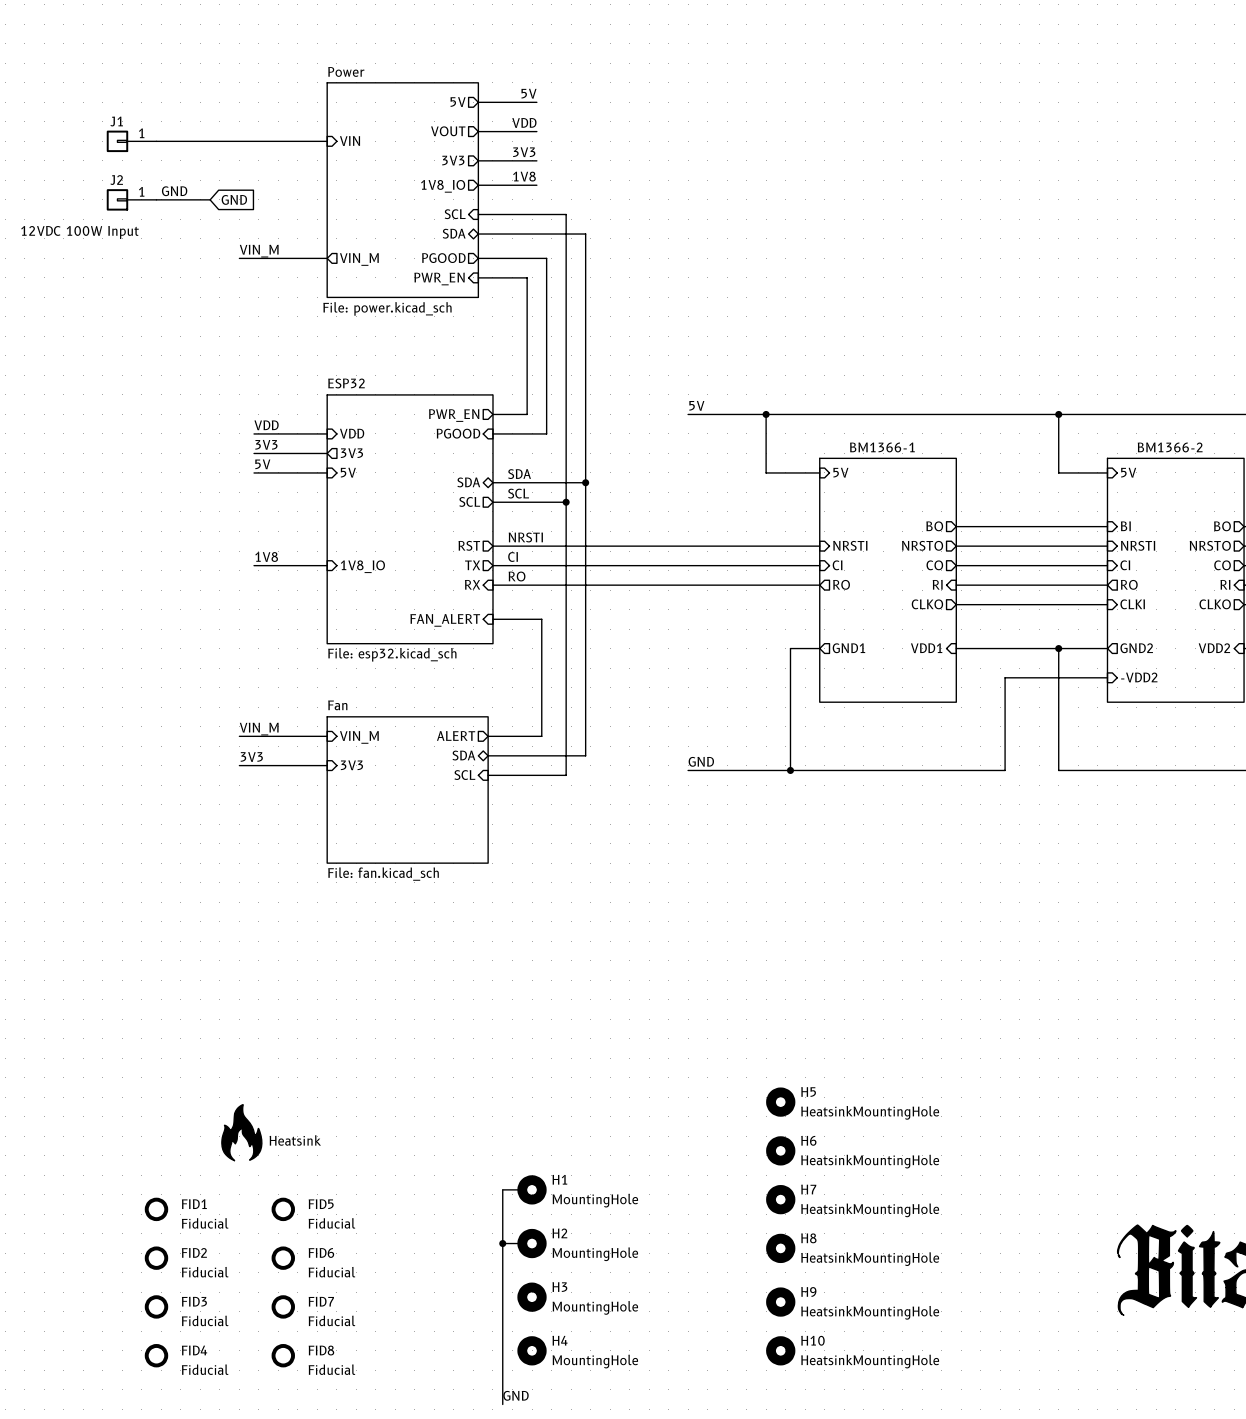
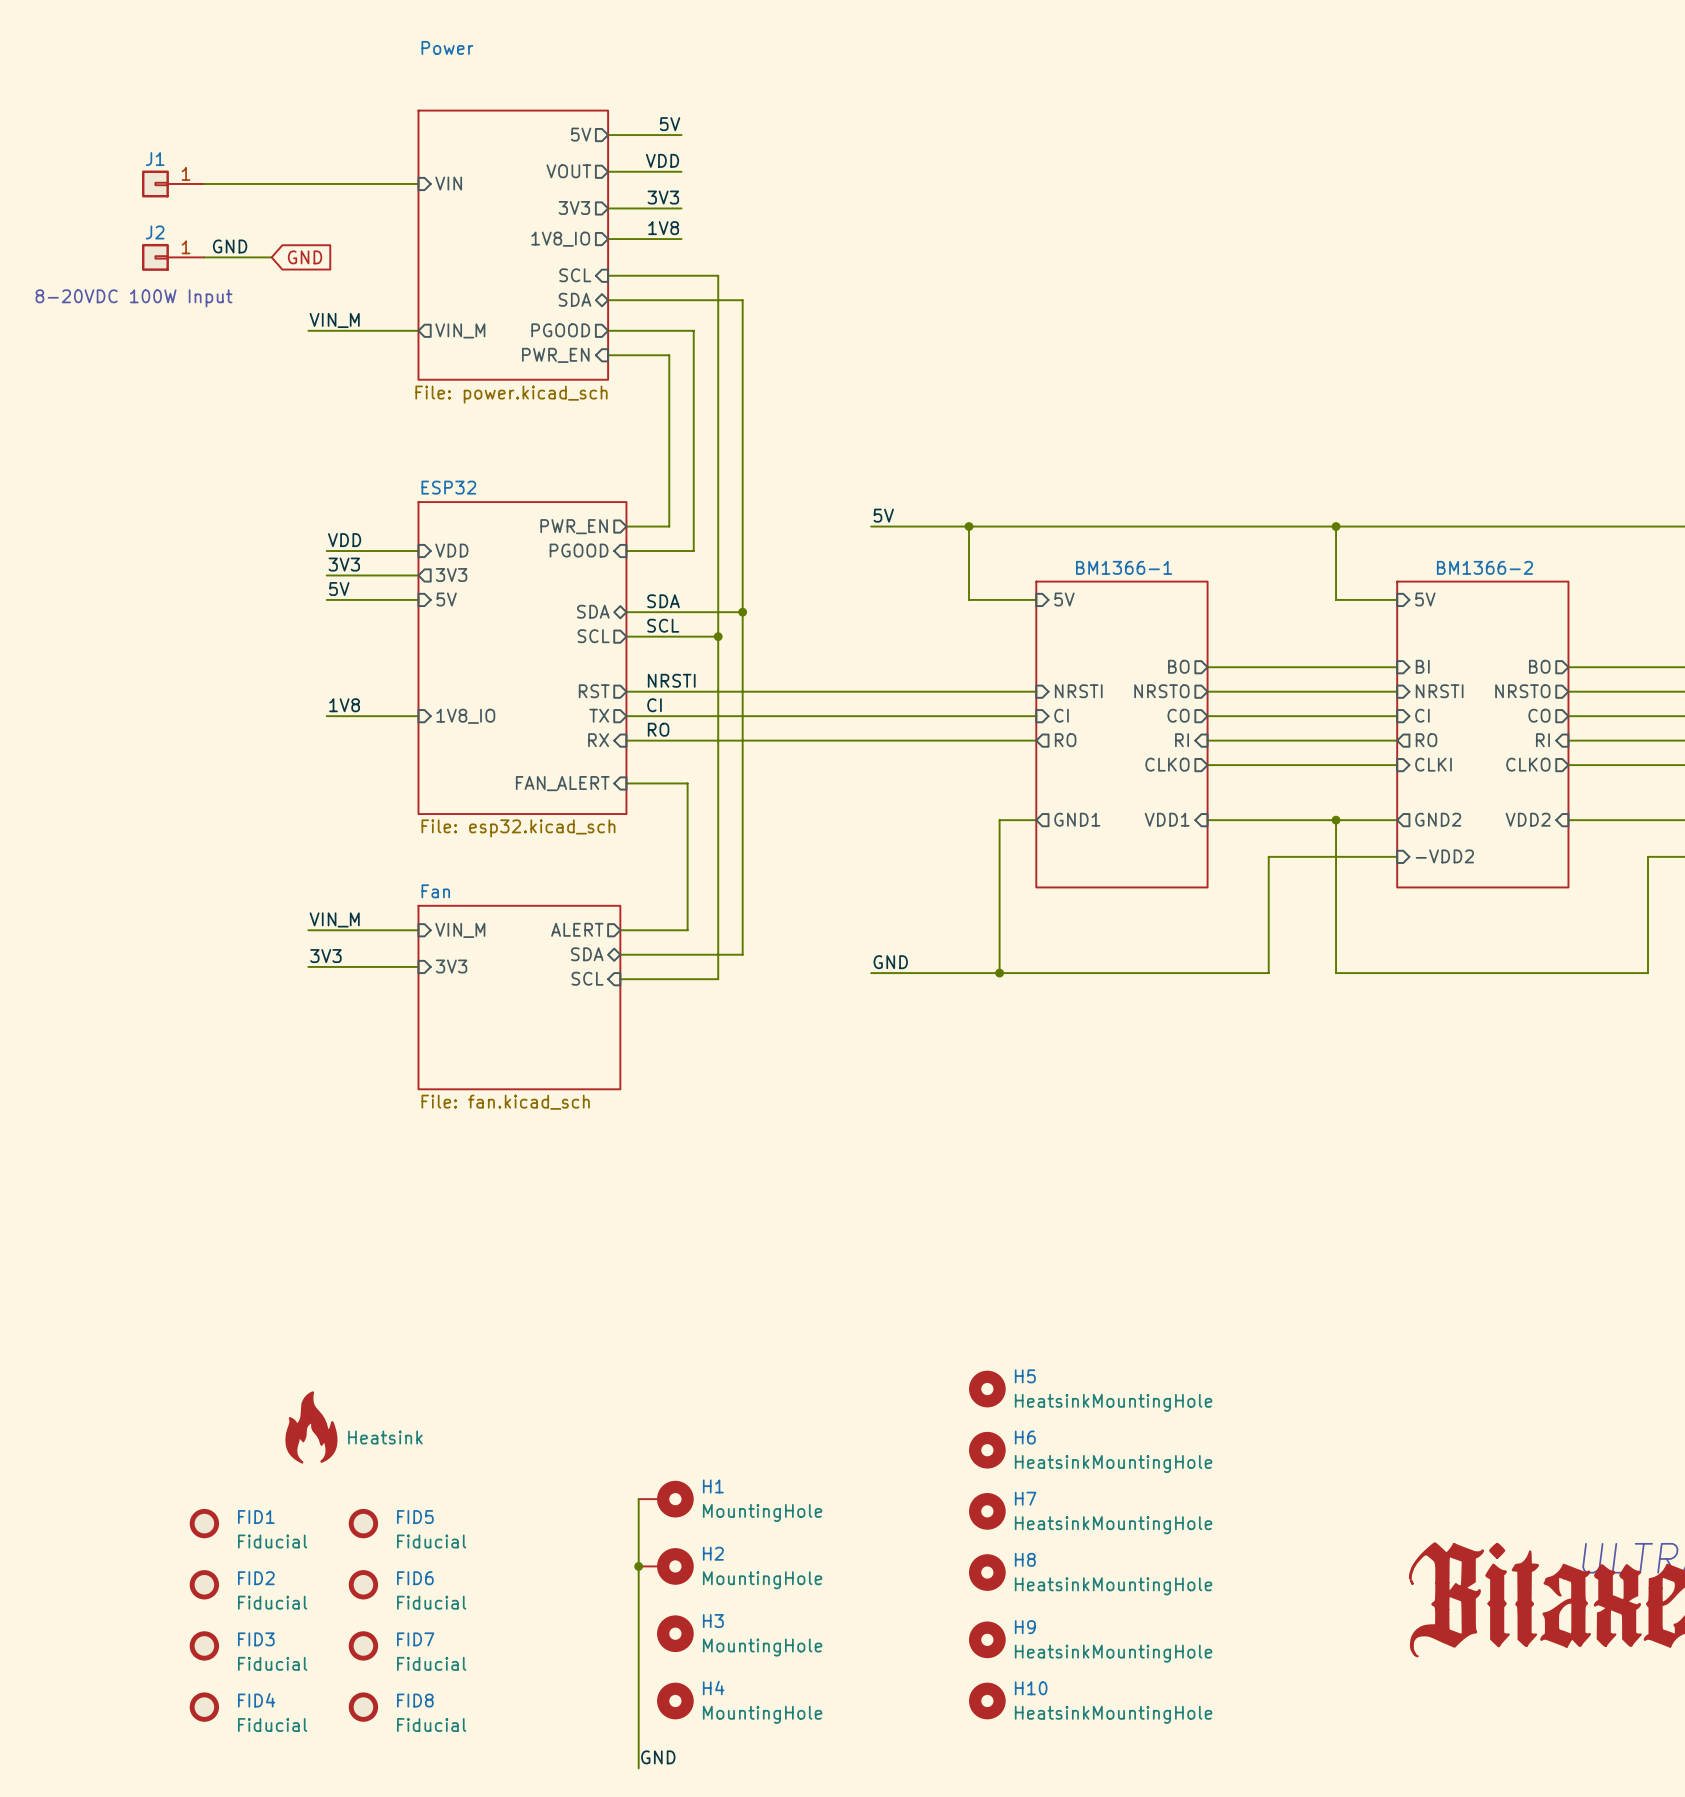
sheet Power name position: Power (346, 71) -> Power (447, 47)
text: 12VDC 100W Input (80, 232) -> 8-20VDC 100W Input (133, 298)

